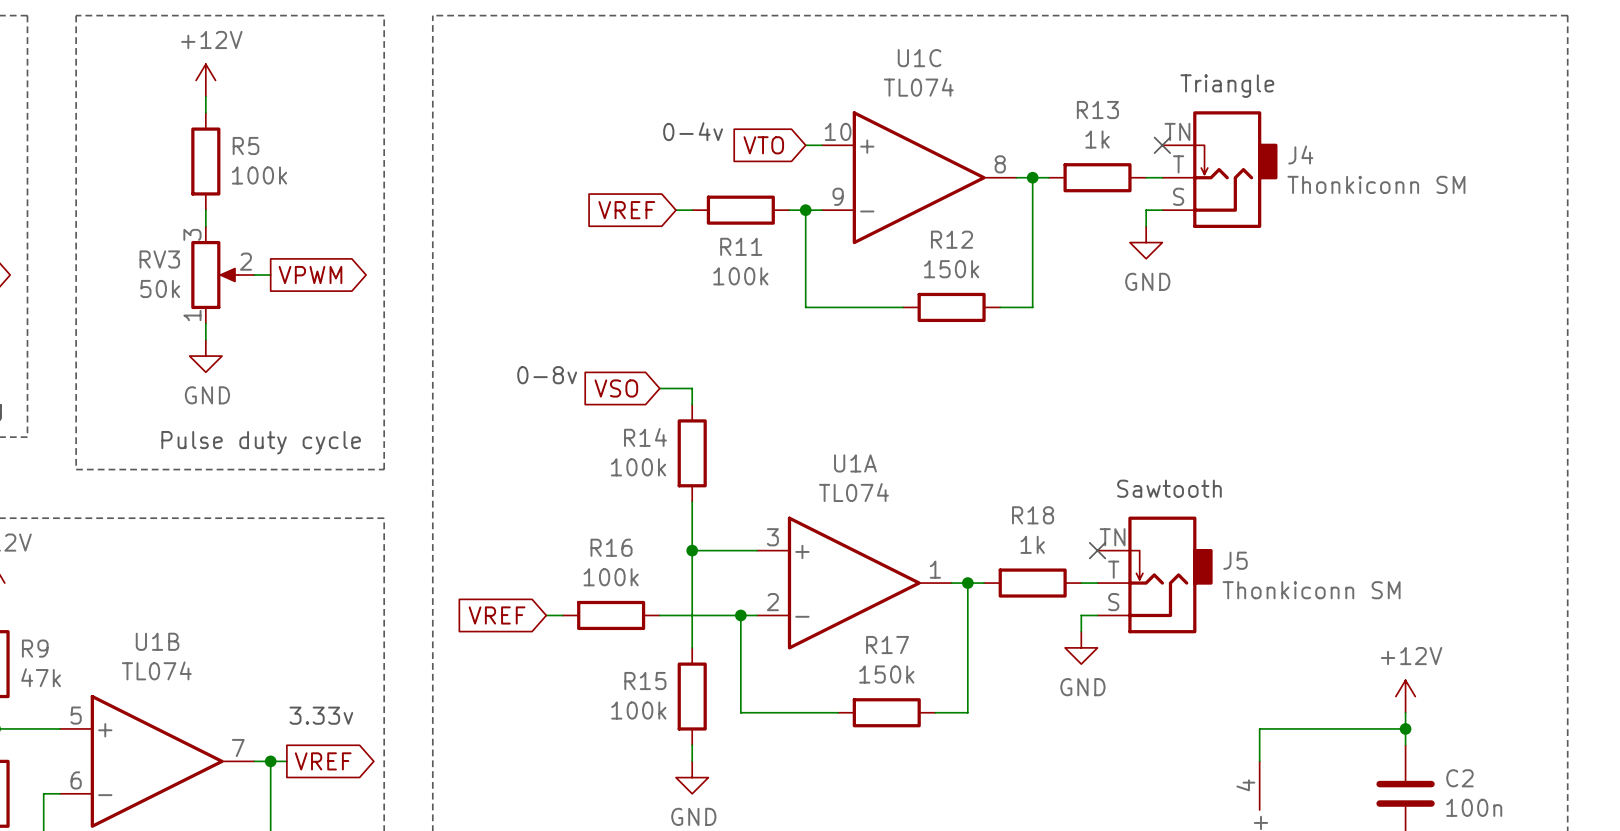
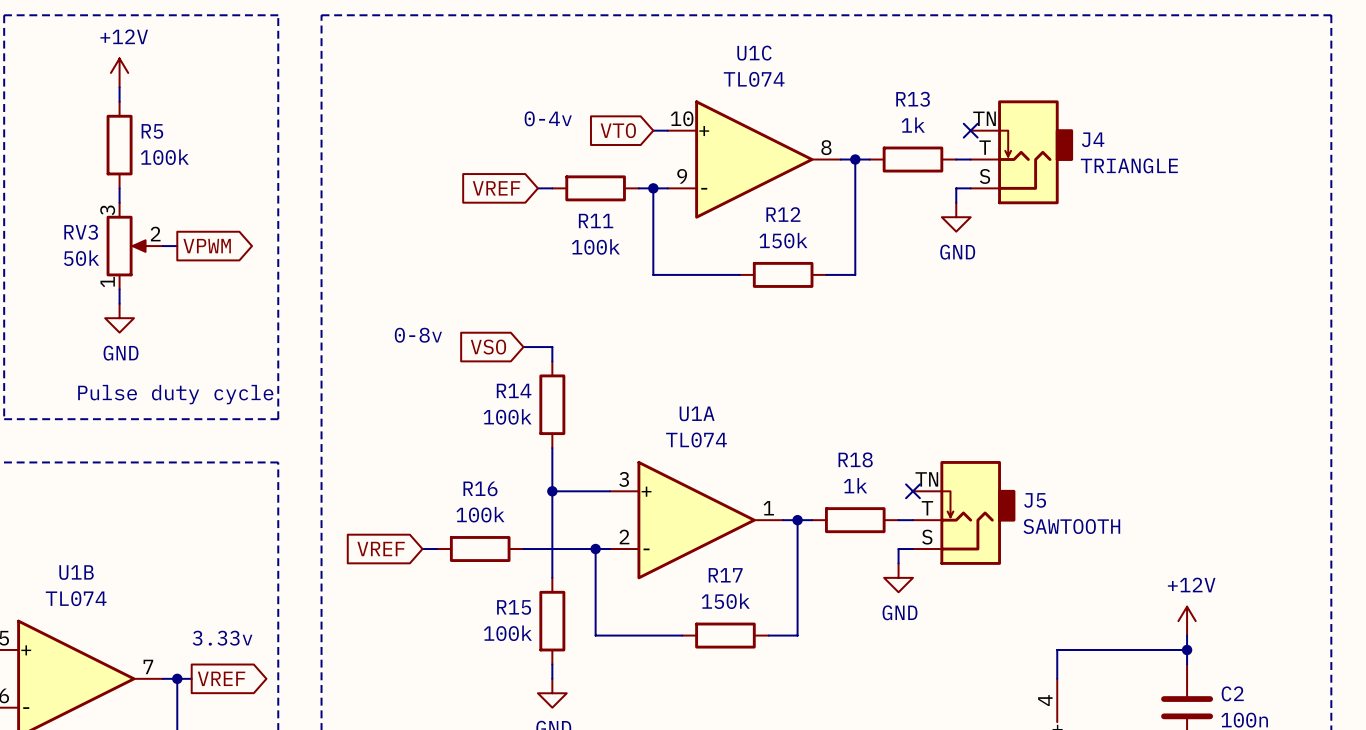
text: Triangle (1227, 86) -> none
J4 value: Thonkiconn SM (1376, 184) -> TRIANGLE (1129, 165)
text: Sawtooth (1169, 488) -> none
J5 value: Thonkiconn SM (1311, 590) -> SAWTOOTH (1071, 526)

